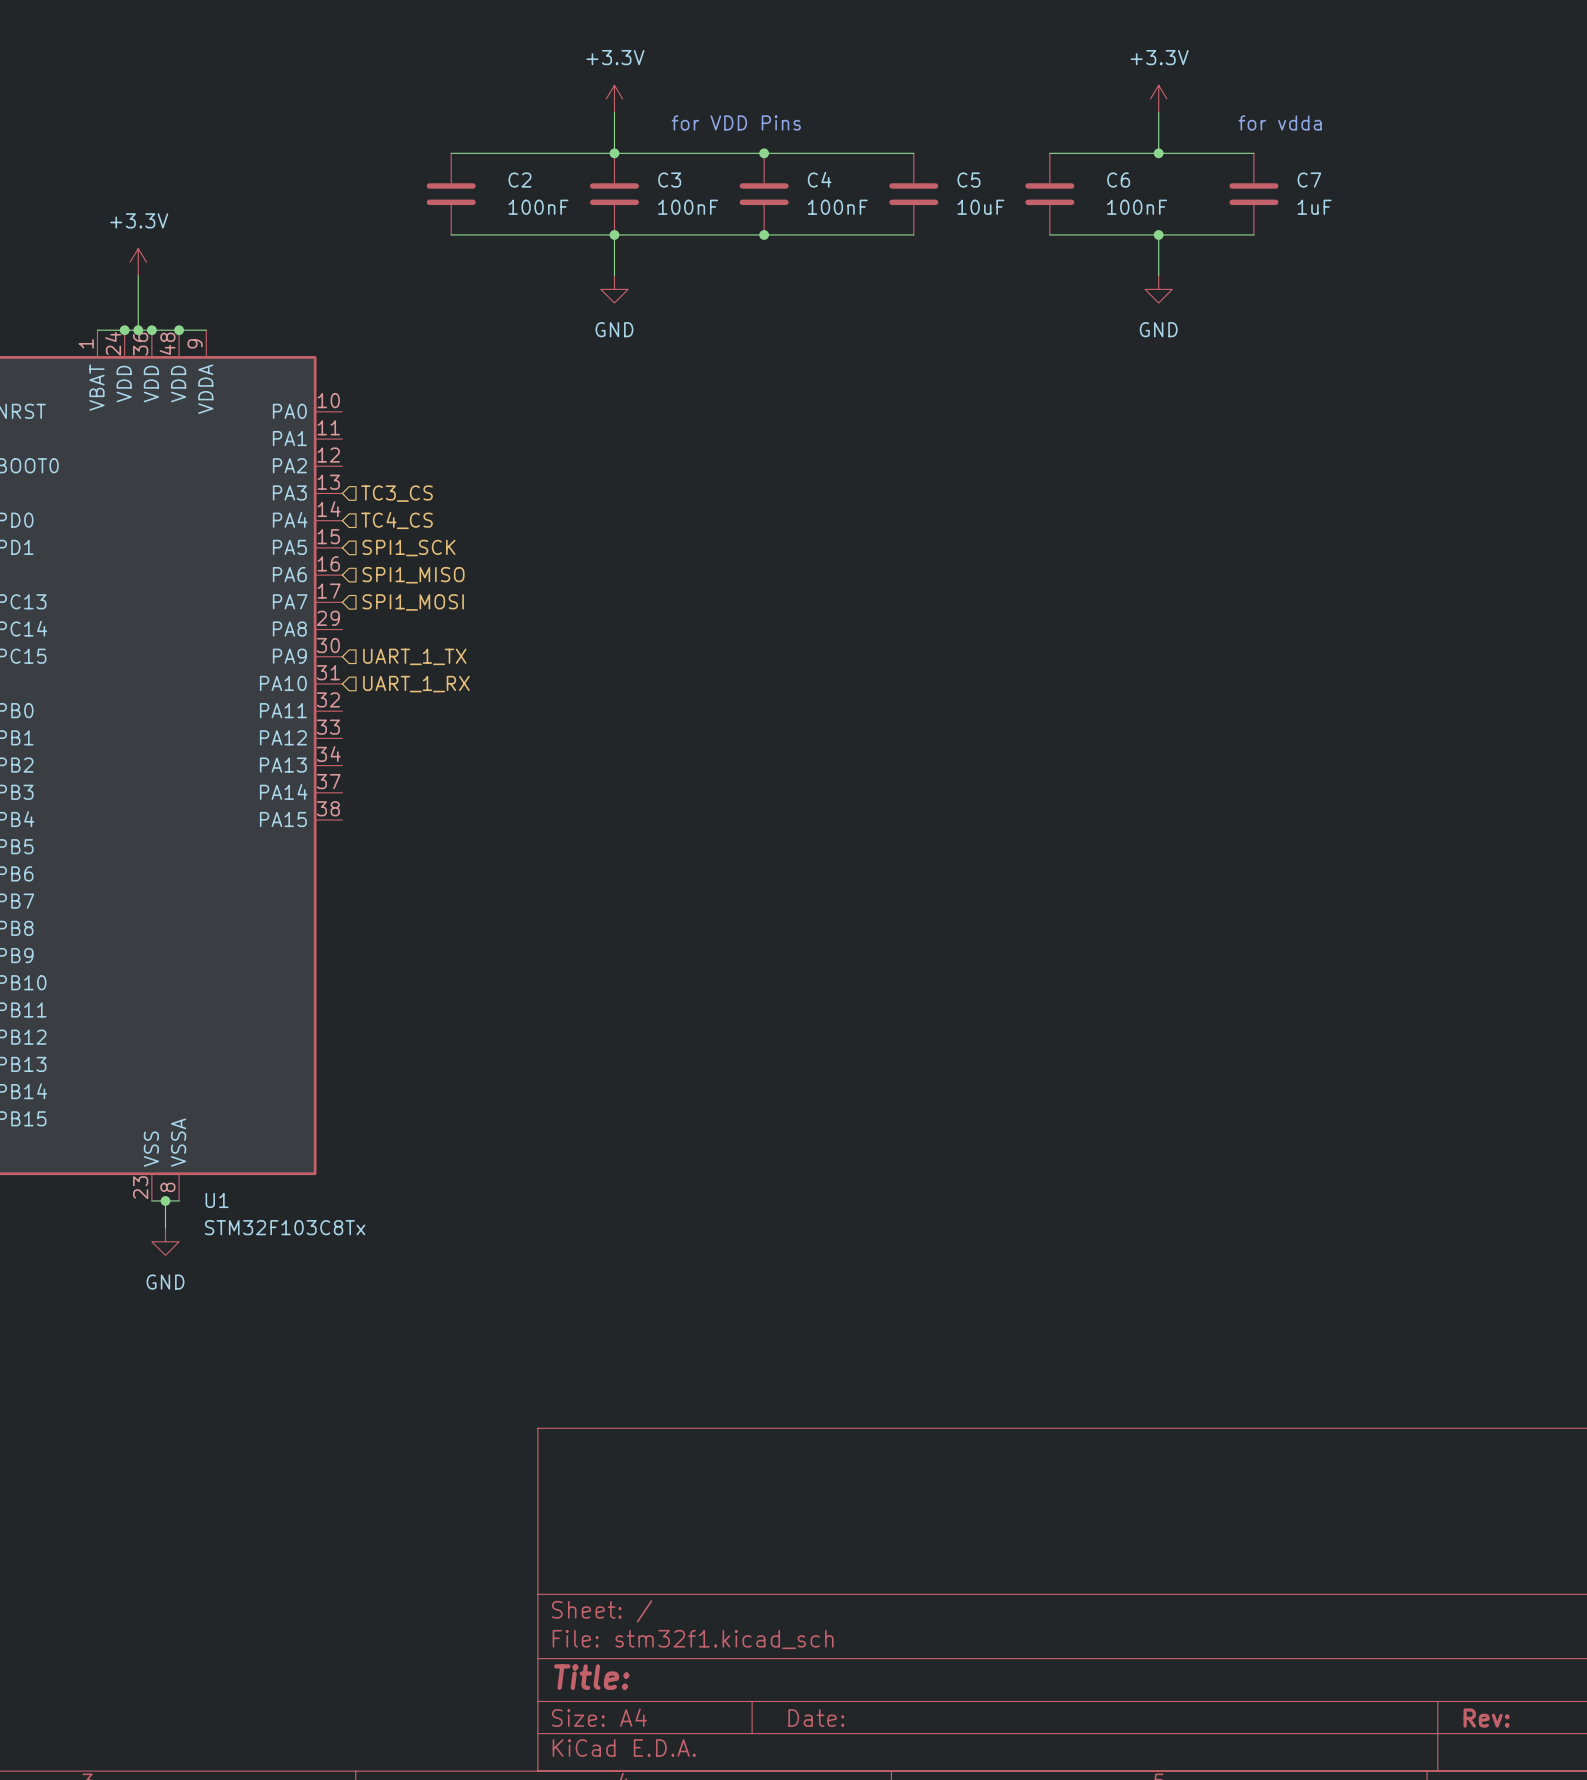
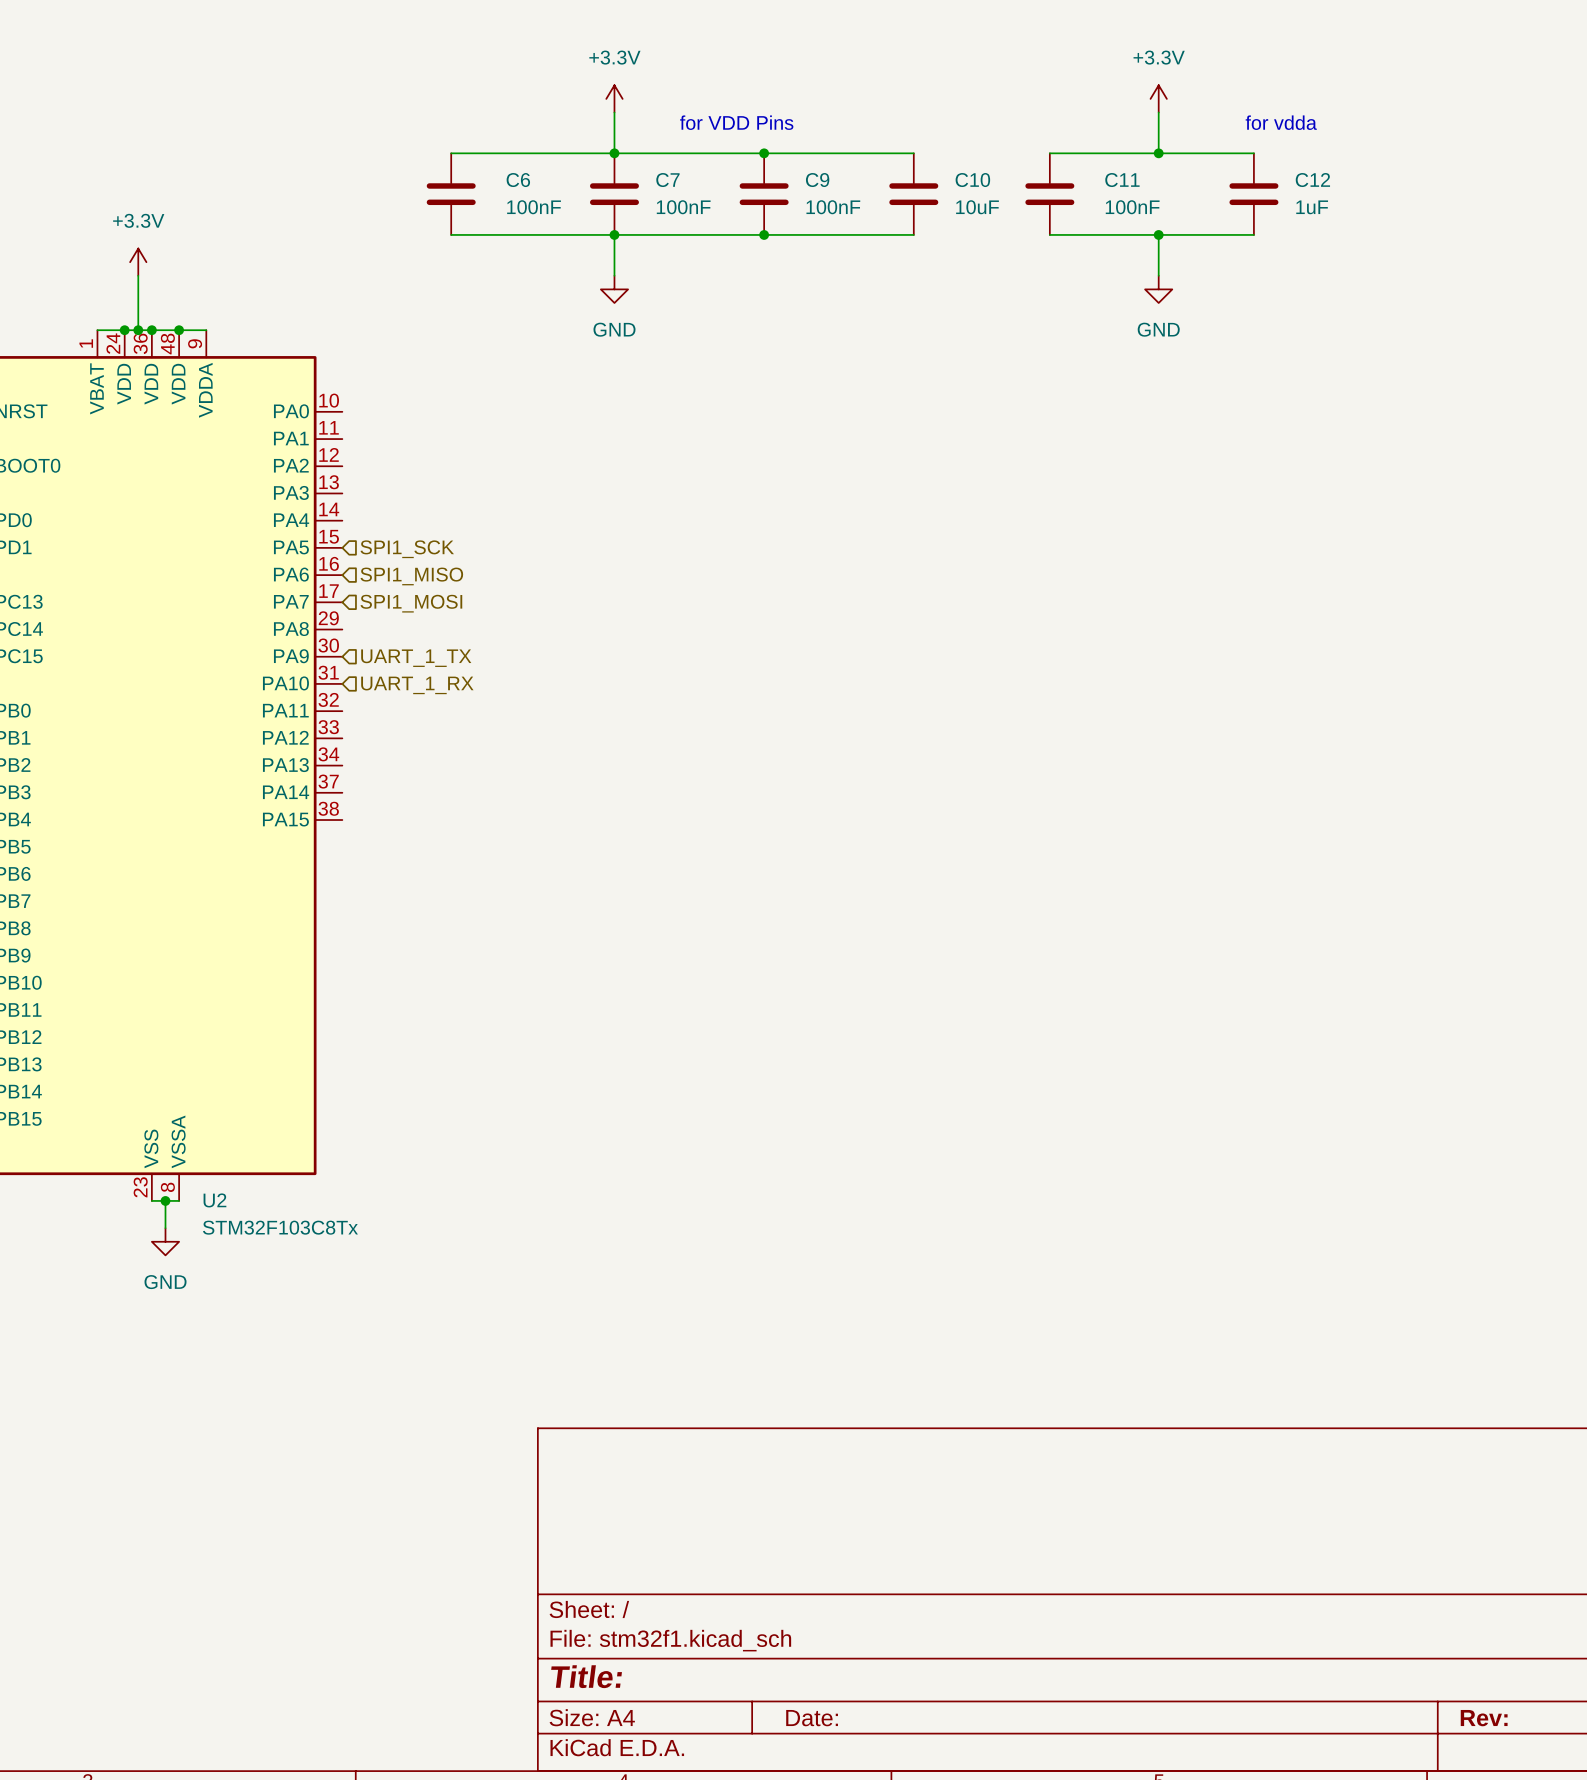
C4 name: C4 (819, 179) -> C9 (817, 180)
C2 name: C2 (519, 180) -> C6 (518, 180)
C3 name: C3 (669, 180) -> C7 (667, 180)
C5 name: C5 (968, 180) -> C10 (972, 180)
C6 name: C6 (1118, 180) -> C11 (1122, 180)
C7 name: C7 (1309, 180) -> C12 (1312, 180)
hierarchical label: TC3_CS (397, 493) -> none
hierarchical label: TC4_CS (397, 520) -> none
U1 name: U1 (217, 1200) -> U2 (214, 1200)

